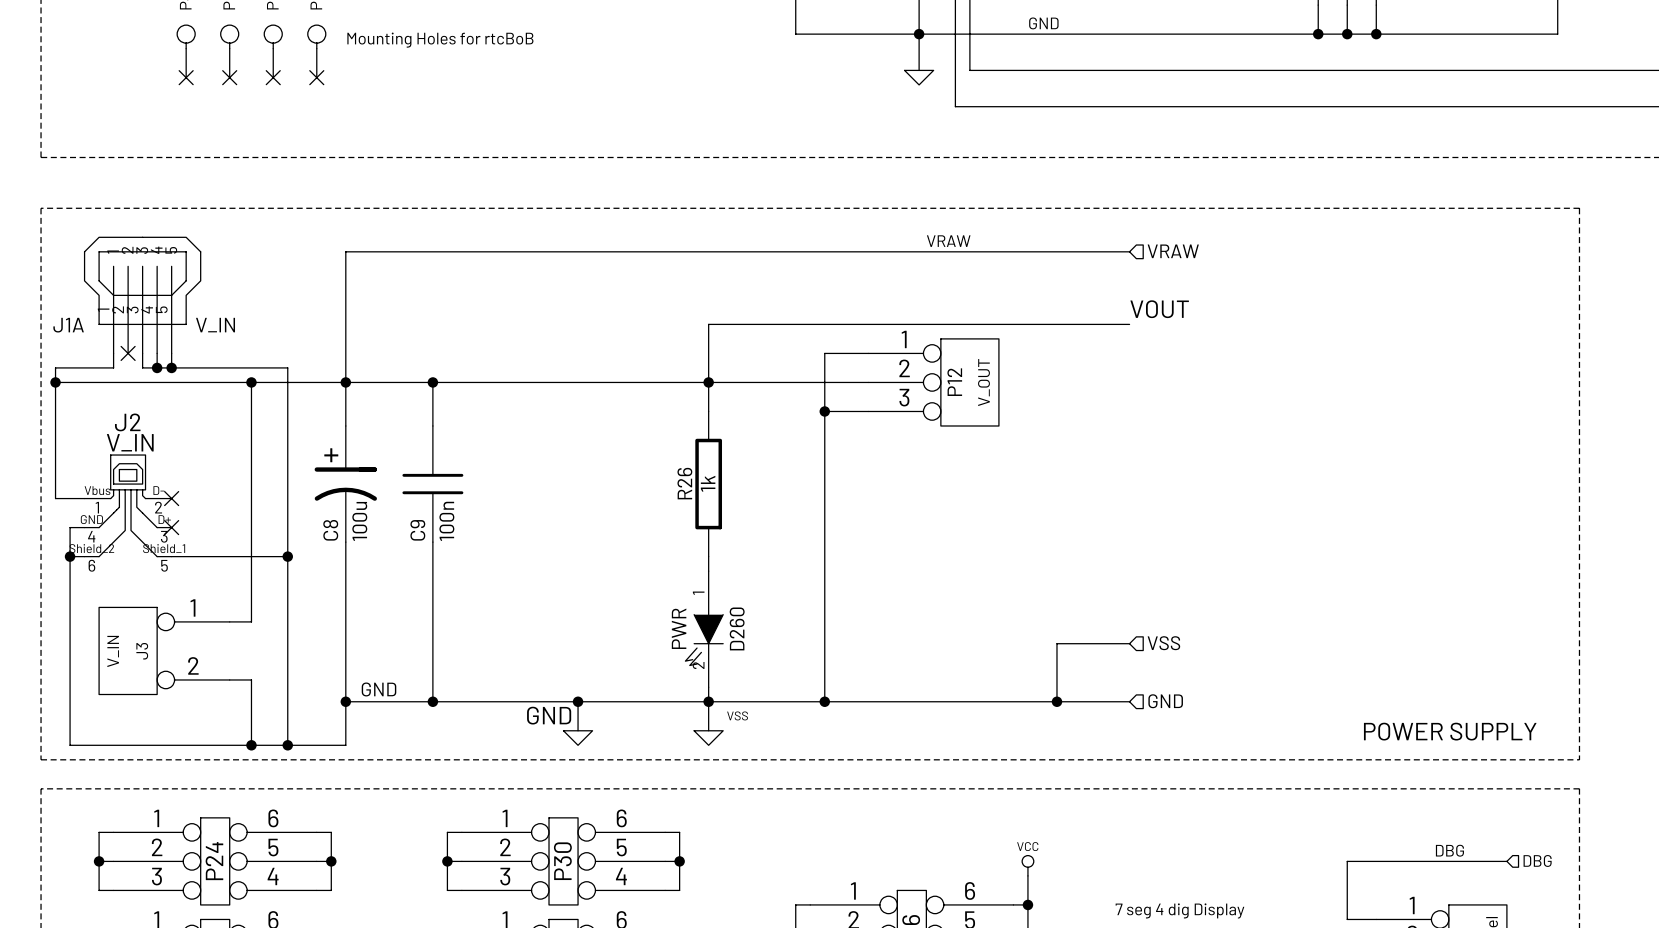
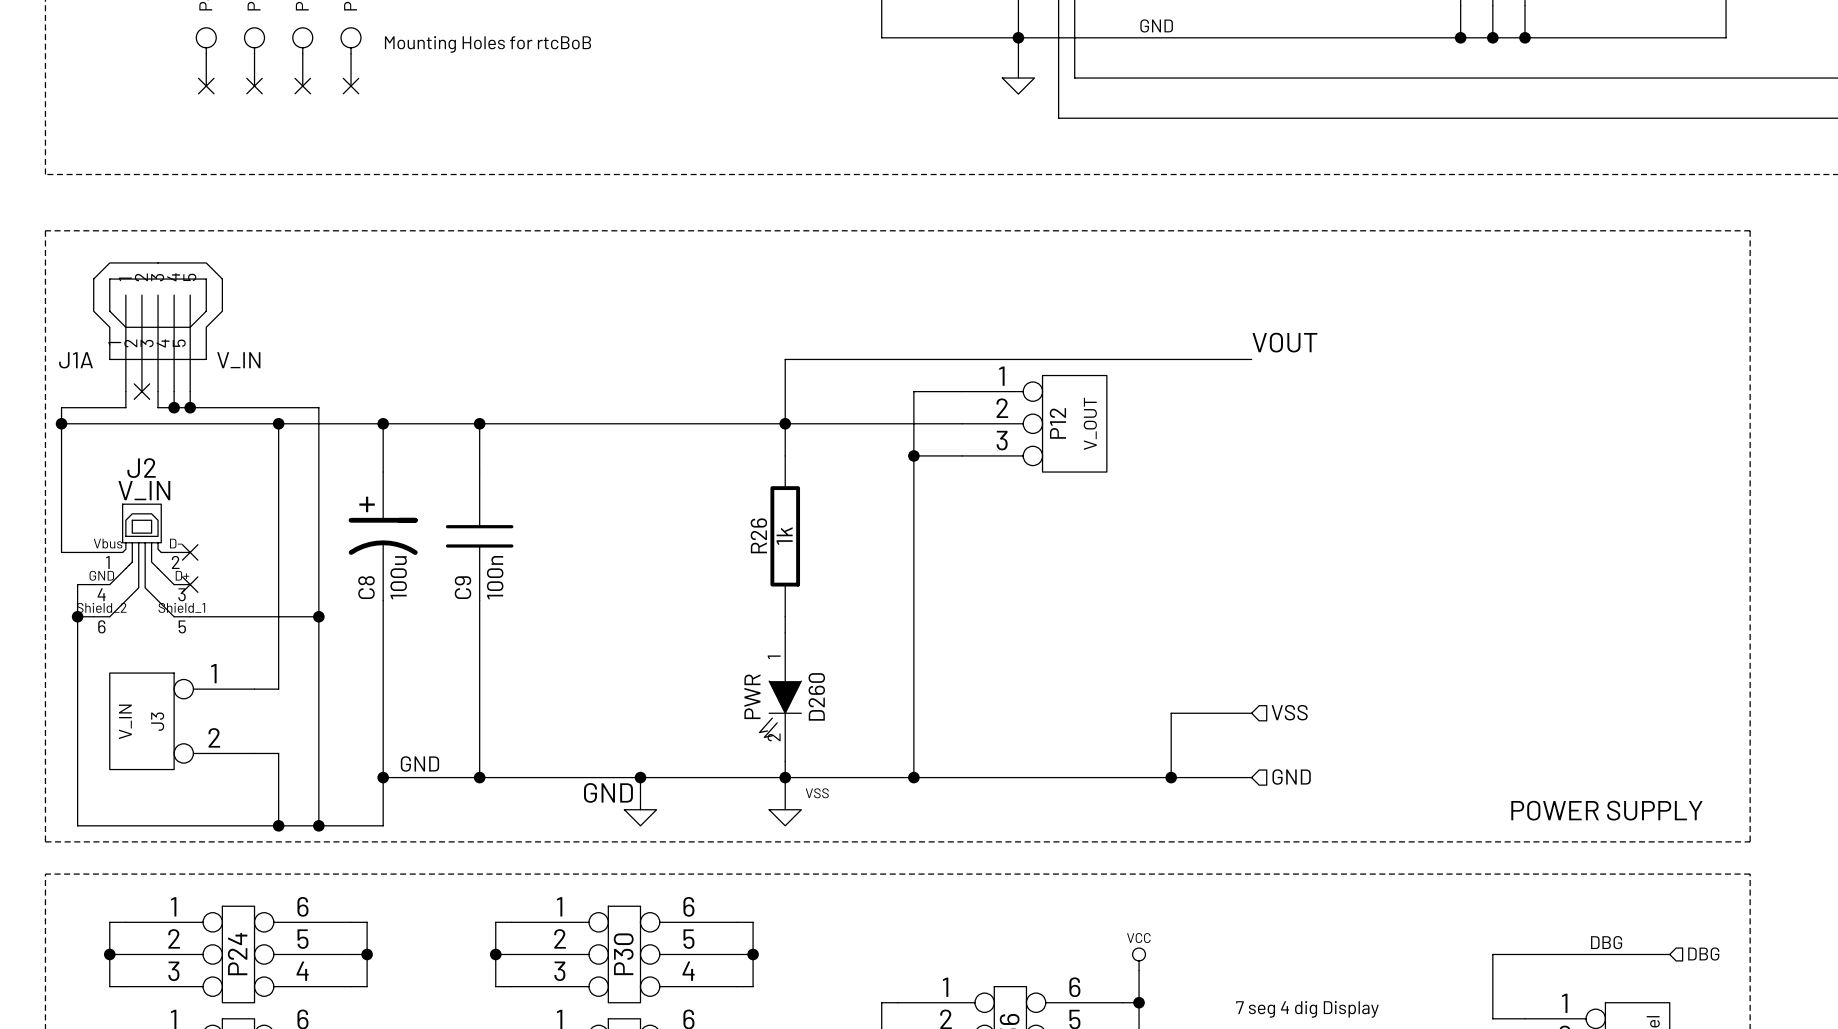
label: VRAW (948, 241) -> none
wire: (1129, 251) (345, 251) (345, 382) -> none
hierarchical label: VRAW (1173, 251) -> none

